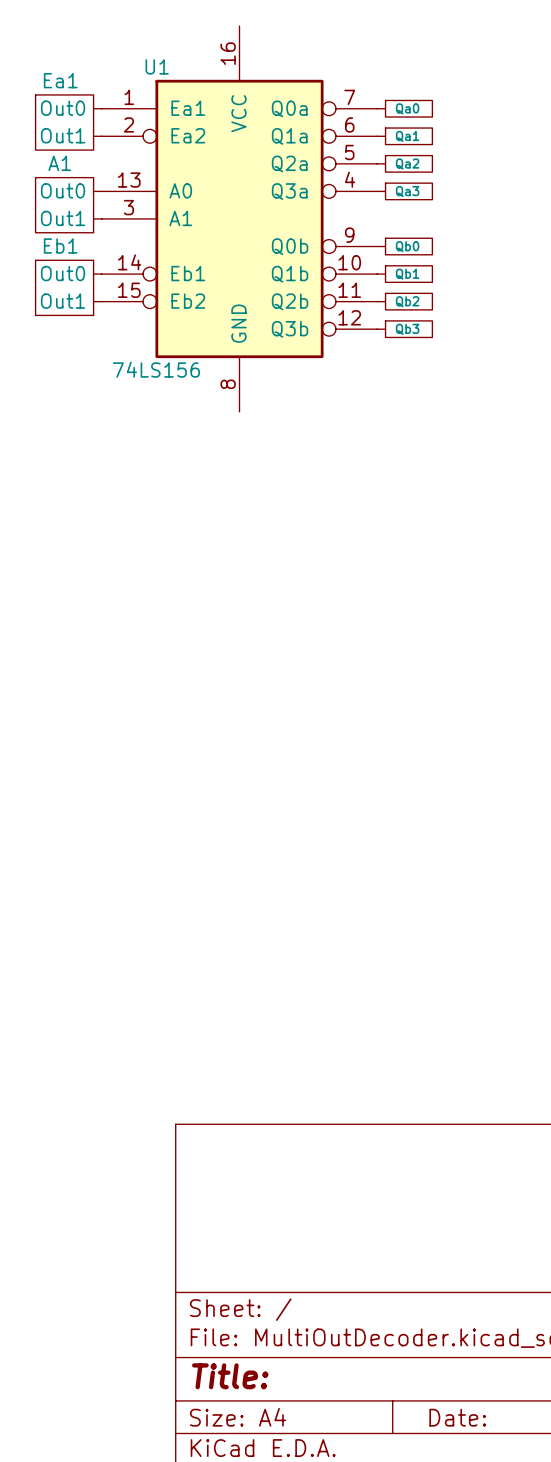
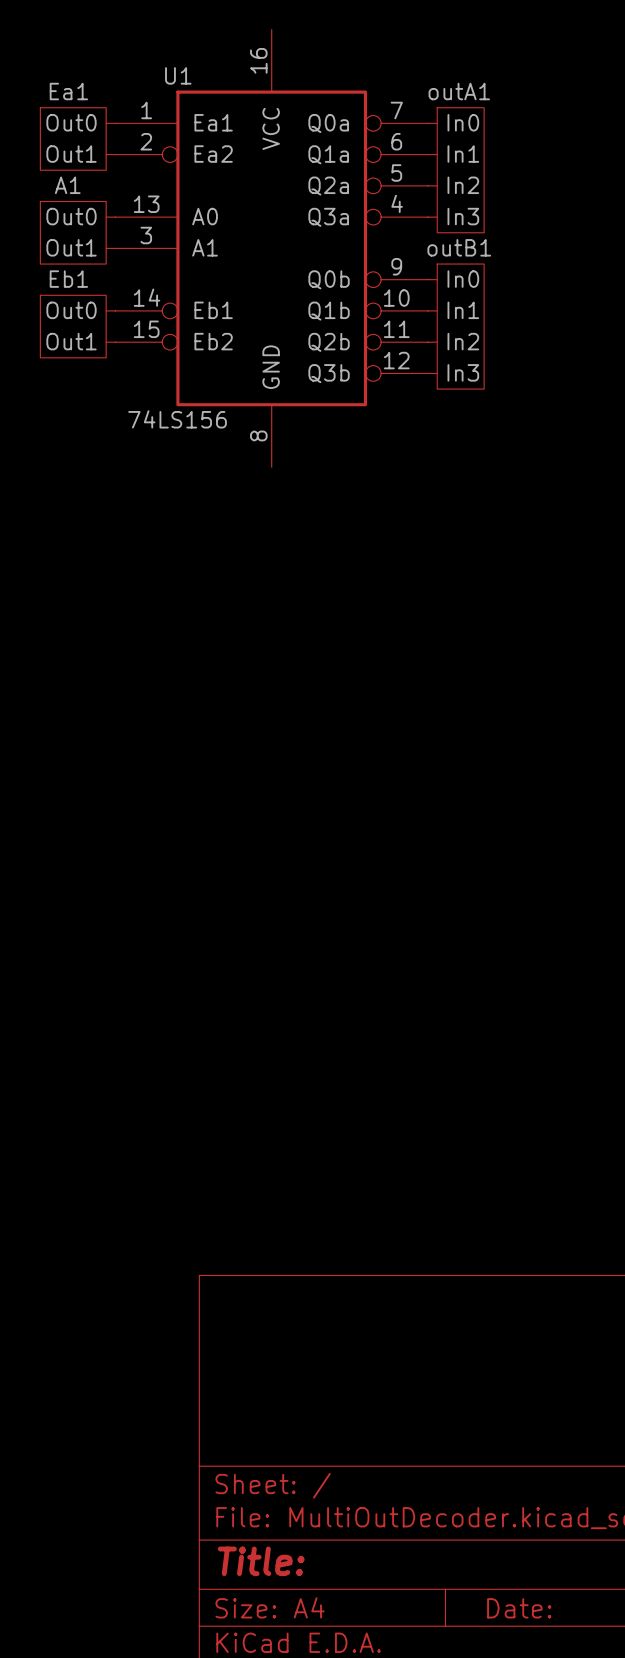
Qa0: (404, 108) -> none
Qa1: (404, 136) -> none
outA1: none -> (456, 170)
Qa2: (404, 163) -> none
Qa3: (404, 191) -> none
Qb0: (404, 246) -> none
Qb1: (404, 274) -> none
outB1: none -> (456, 326)
Qb2: (404, 301) -> none
Qb3: (404, 329) -> none

